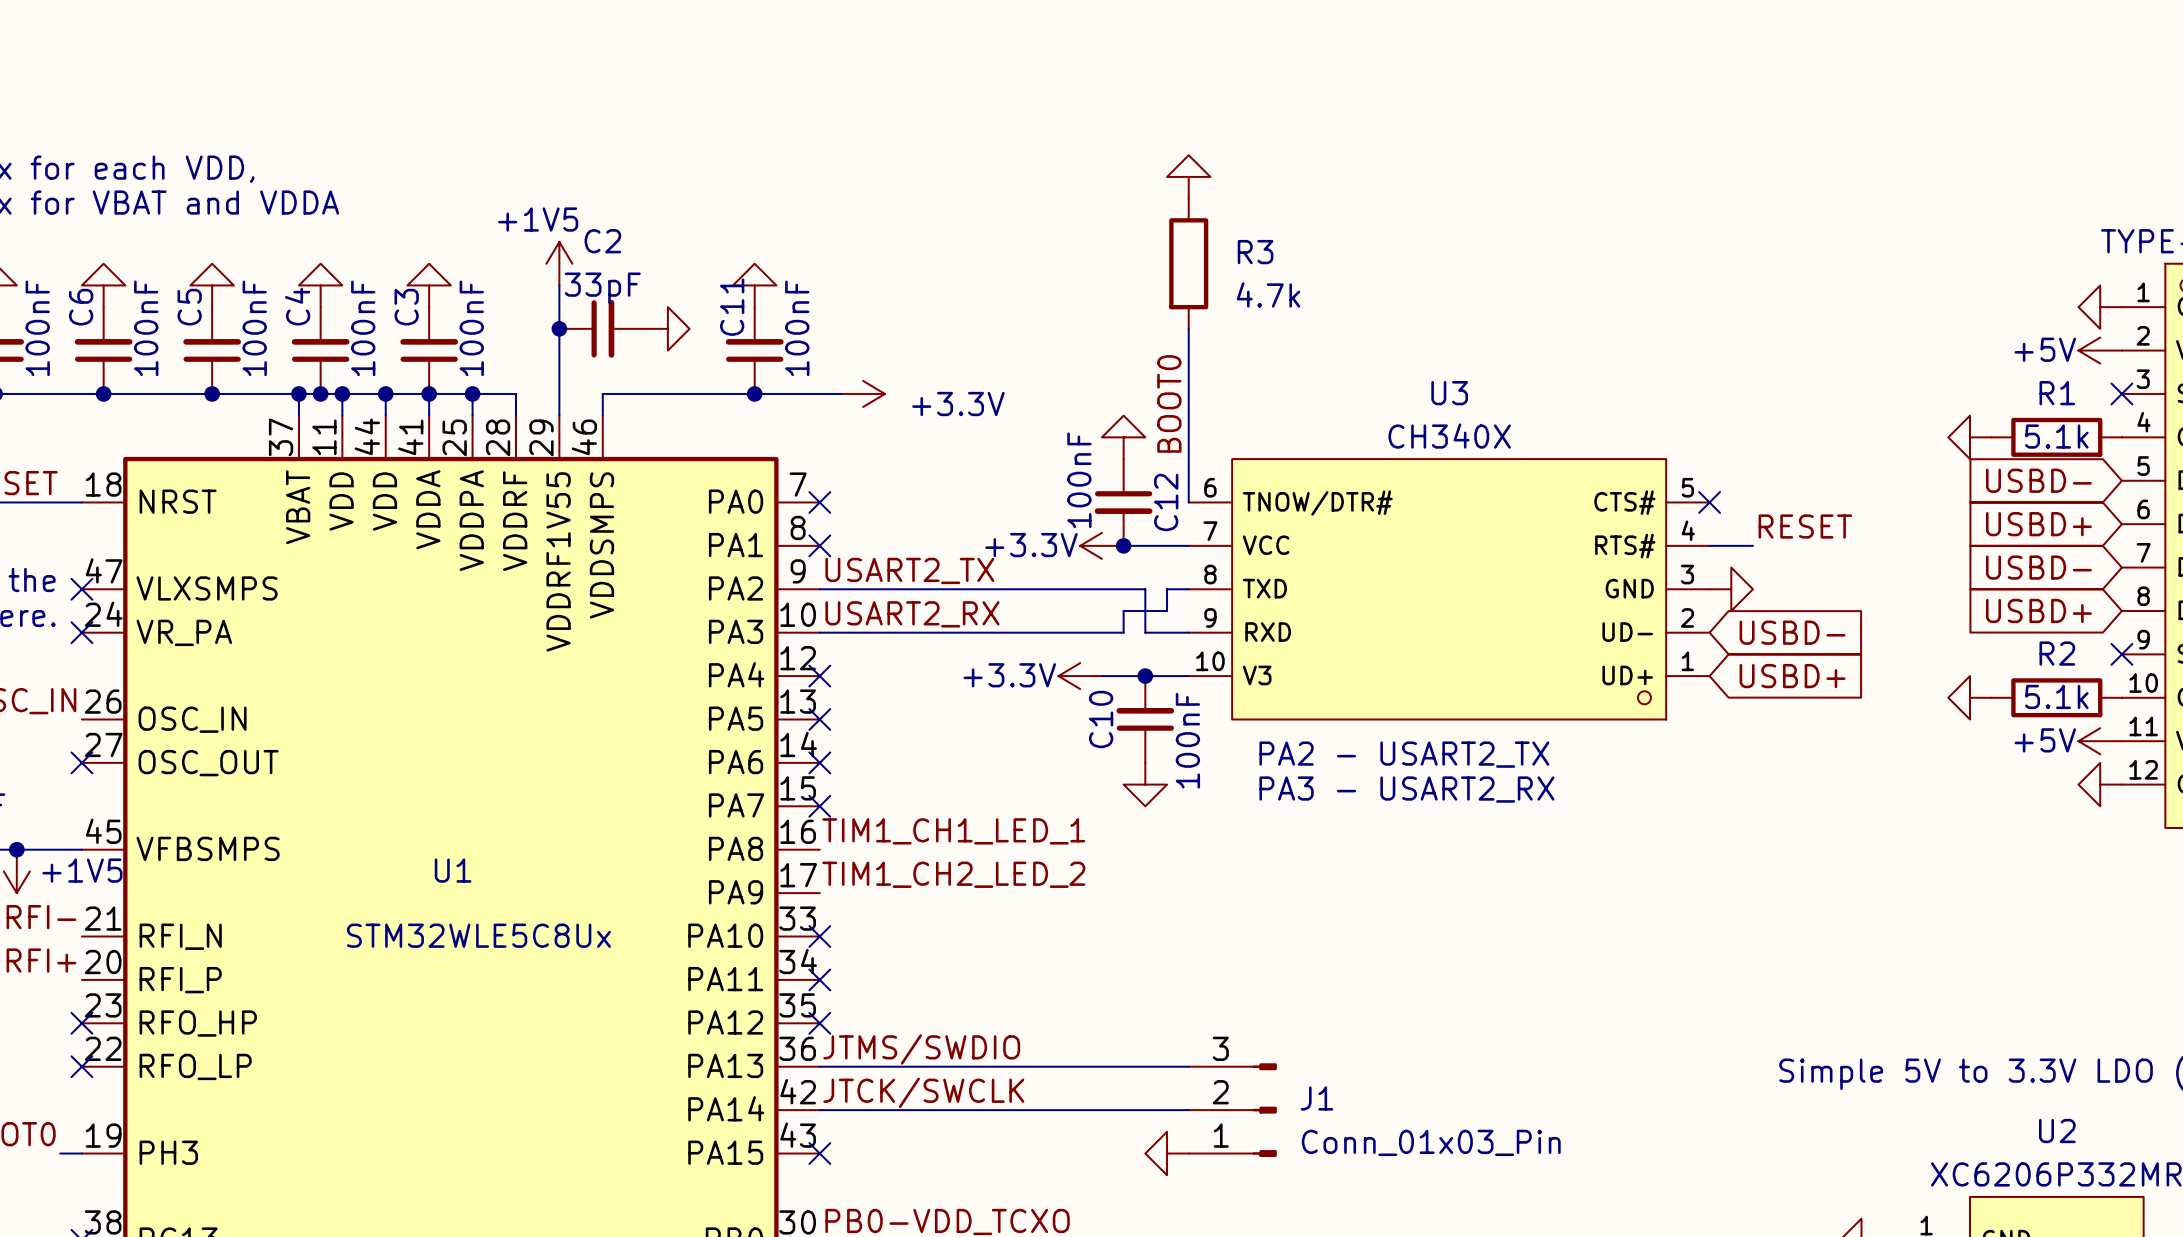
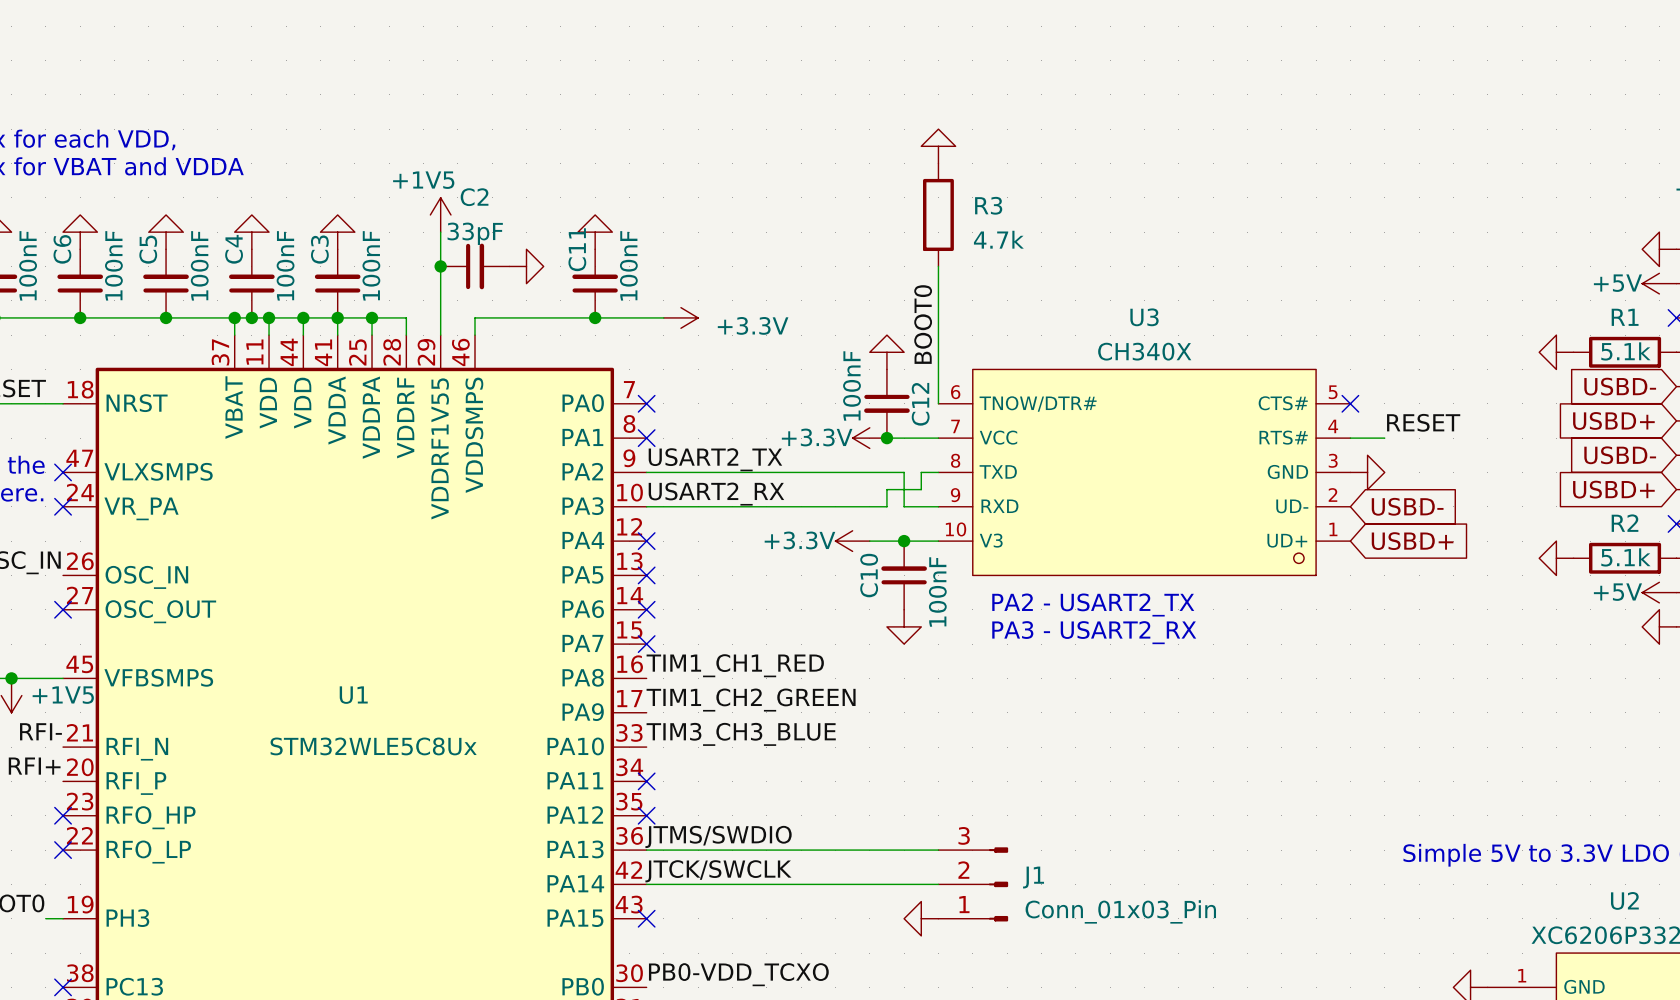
label: TIM1_CH1_LED_1 (953, 831) -> TIM1_CH1_RED (735, 665)
label: TIM1_CH2_LED_2 (953, 874) -> TIM1_CH2_GREEN (751, 700)
label: none -> TIM3_CH3_BLUE (741, 734)
no-connect mark: (819, 936) -> none

